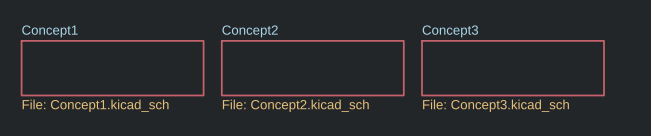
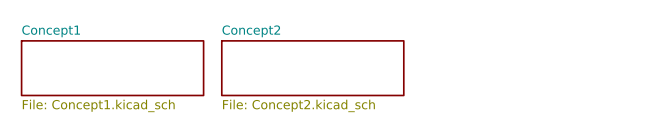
sheet Concept3: File: Concept3.kicad_sch (513, 68) -> none

